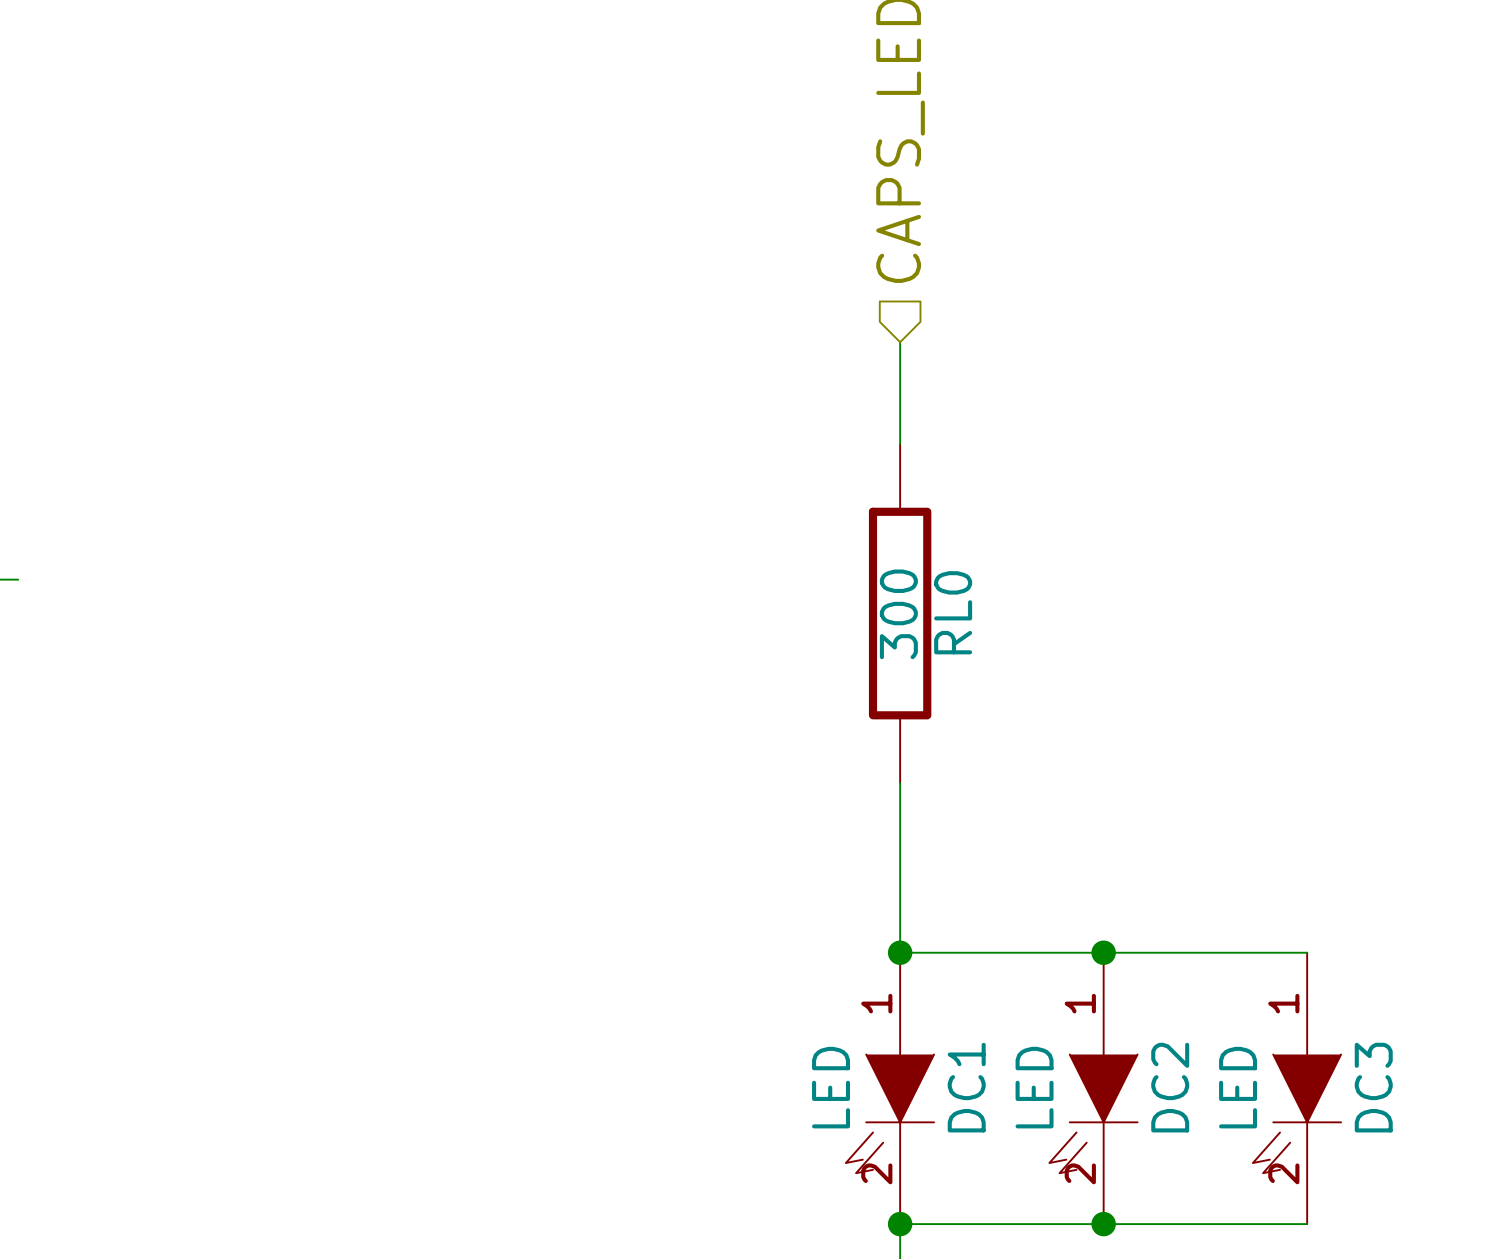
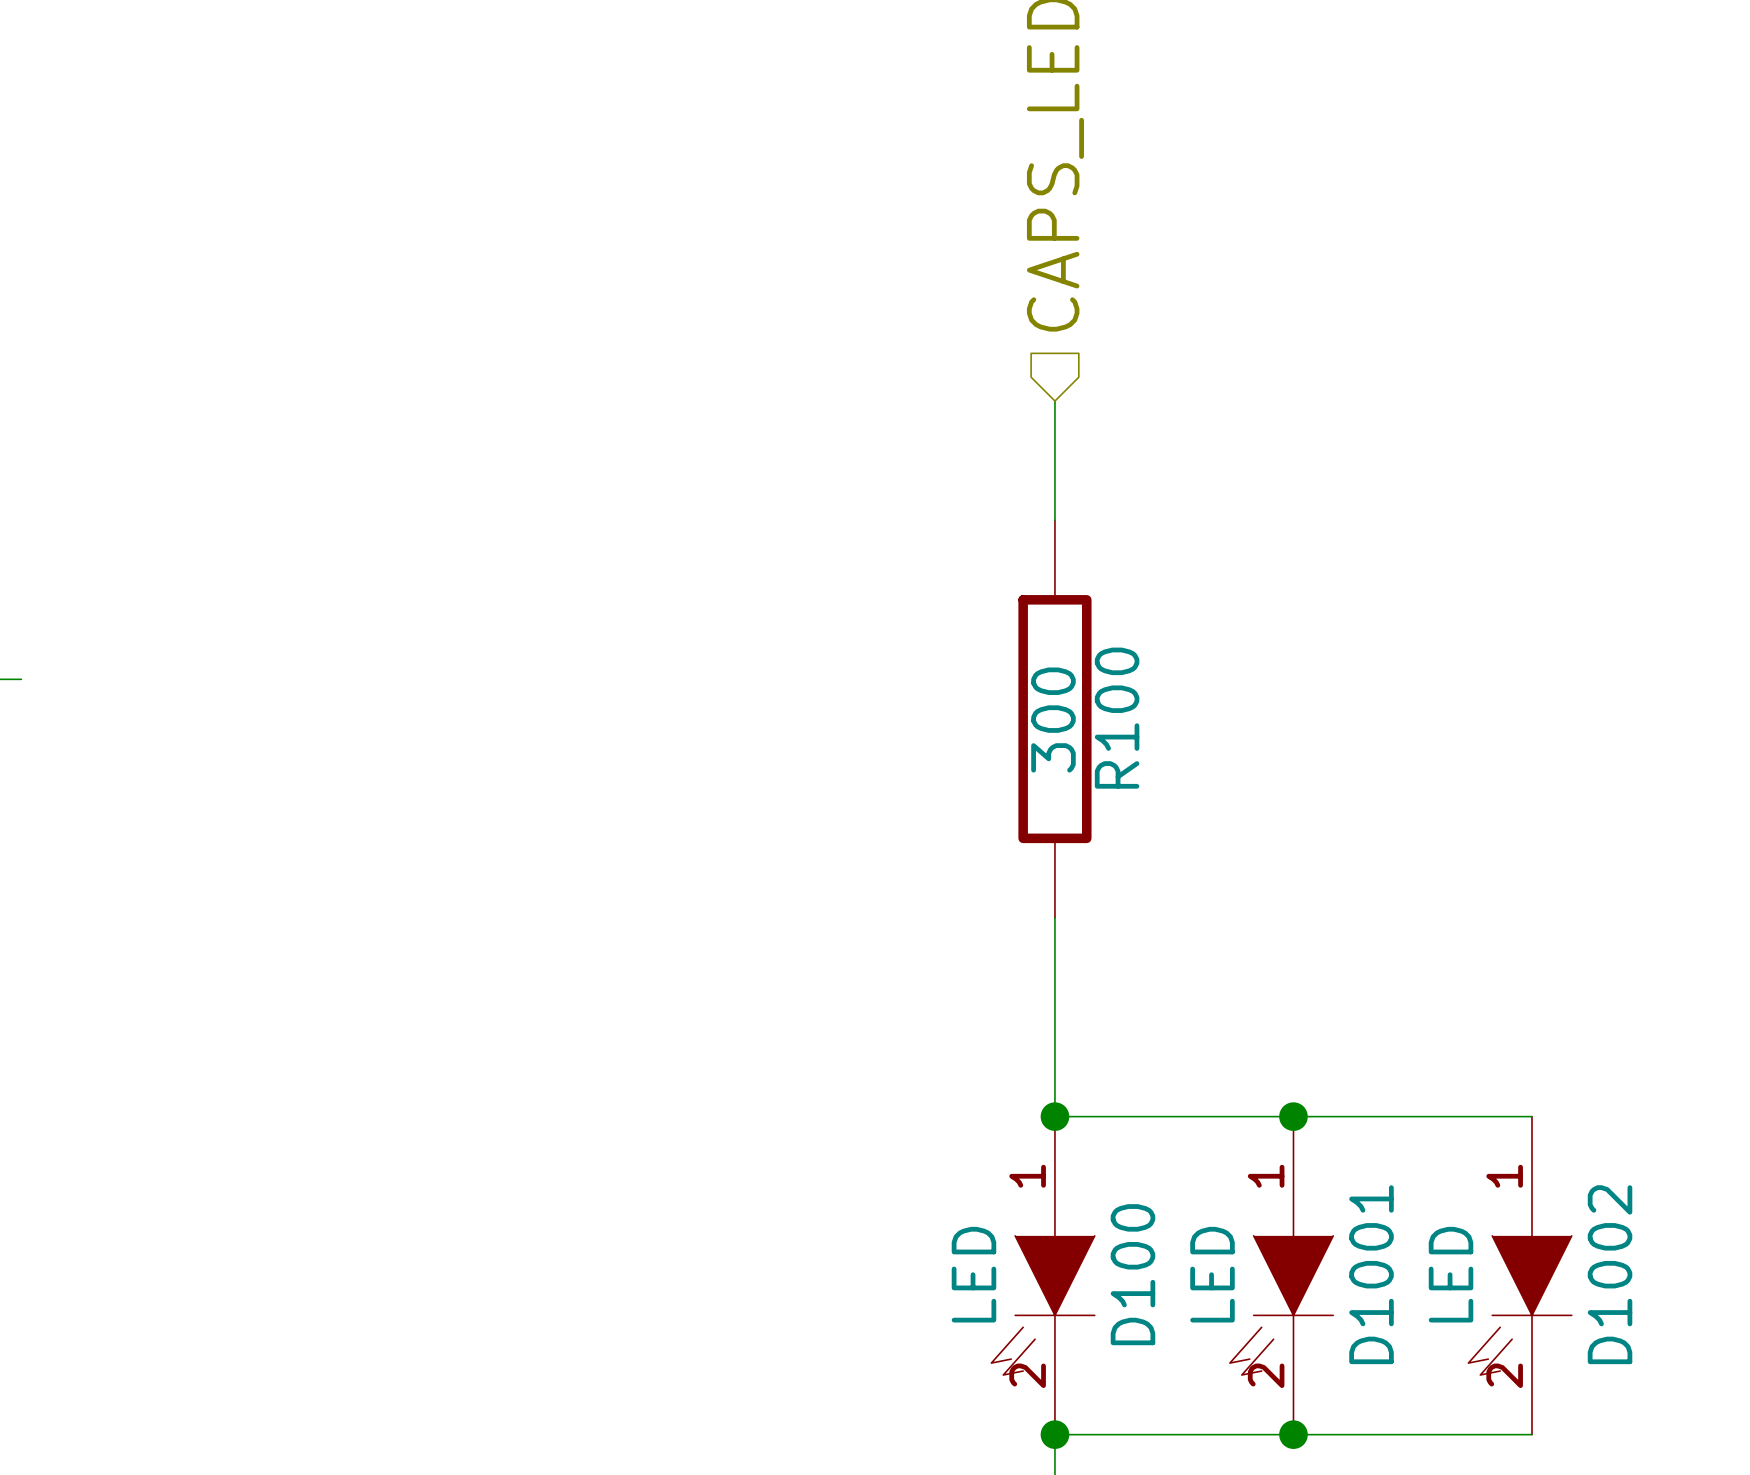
RL0 name: RL0 (953, 612) -> R100 (1117, 718)
DC1 name: DC1 (966, 1087) -> D100 (1132, 1274)
DC2 name: DC2 (1170, 1087) -> D1001 (1371, 1274)
DC3 name: DC3 (1373, 1087) -> D1002 (1610, 1274)

